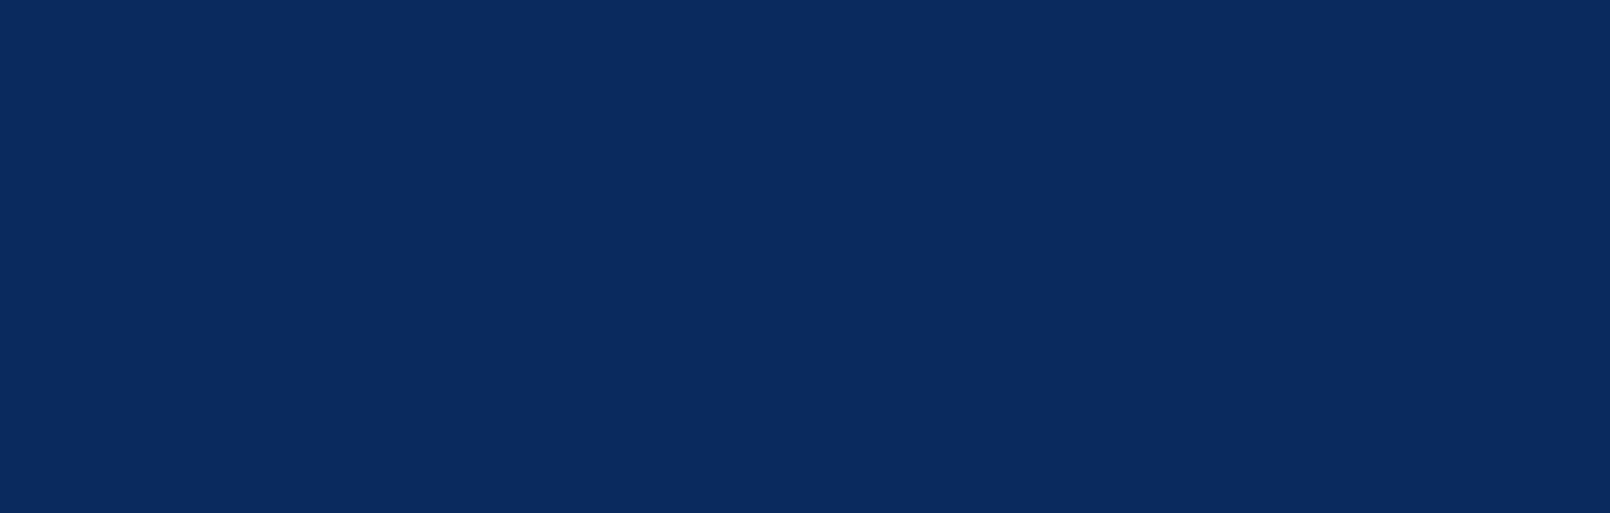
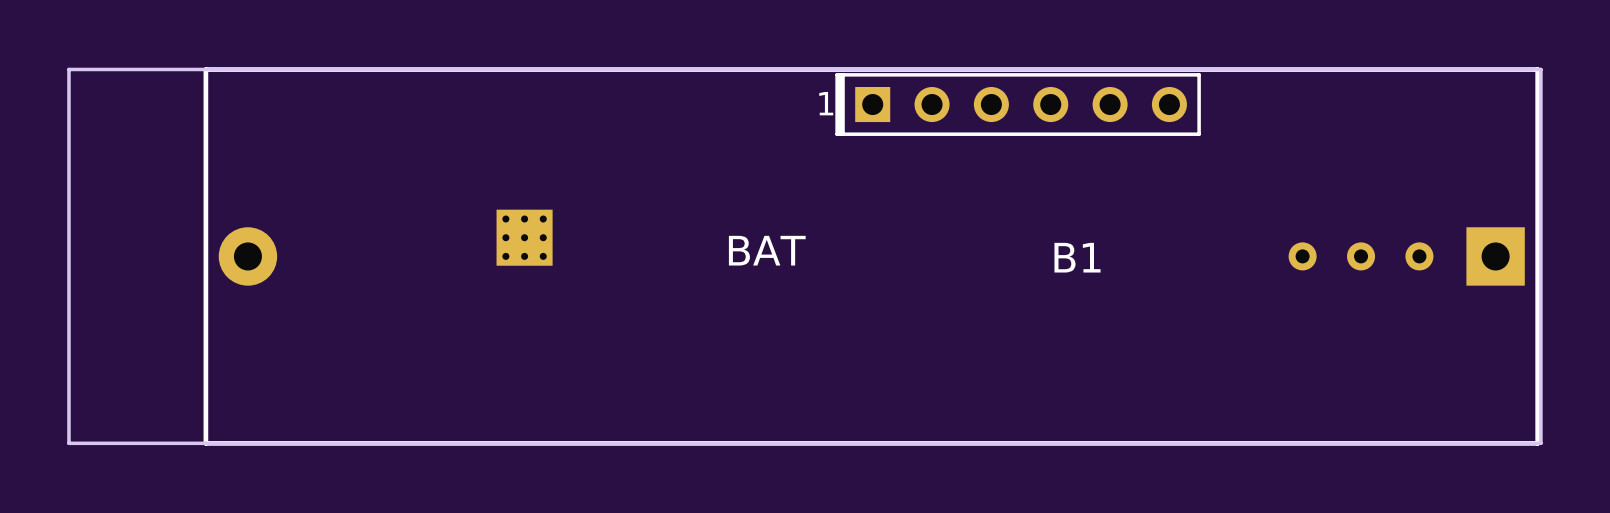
board edge: none -> (1540, 69) (1540, 443) (68, 443) (68, 69) (1540, 69)
part: none -> (1018, 104)
part: none -> (524, 237)
B1: none -> BAT (871, 256)
part: none -> (1361, 256)

